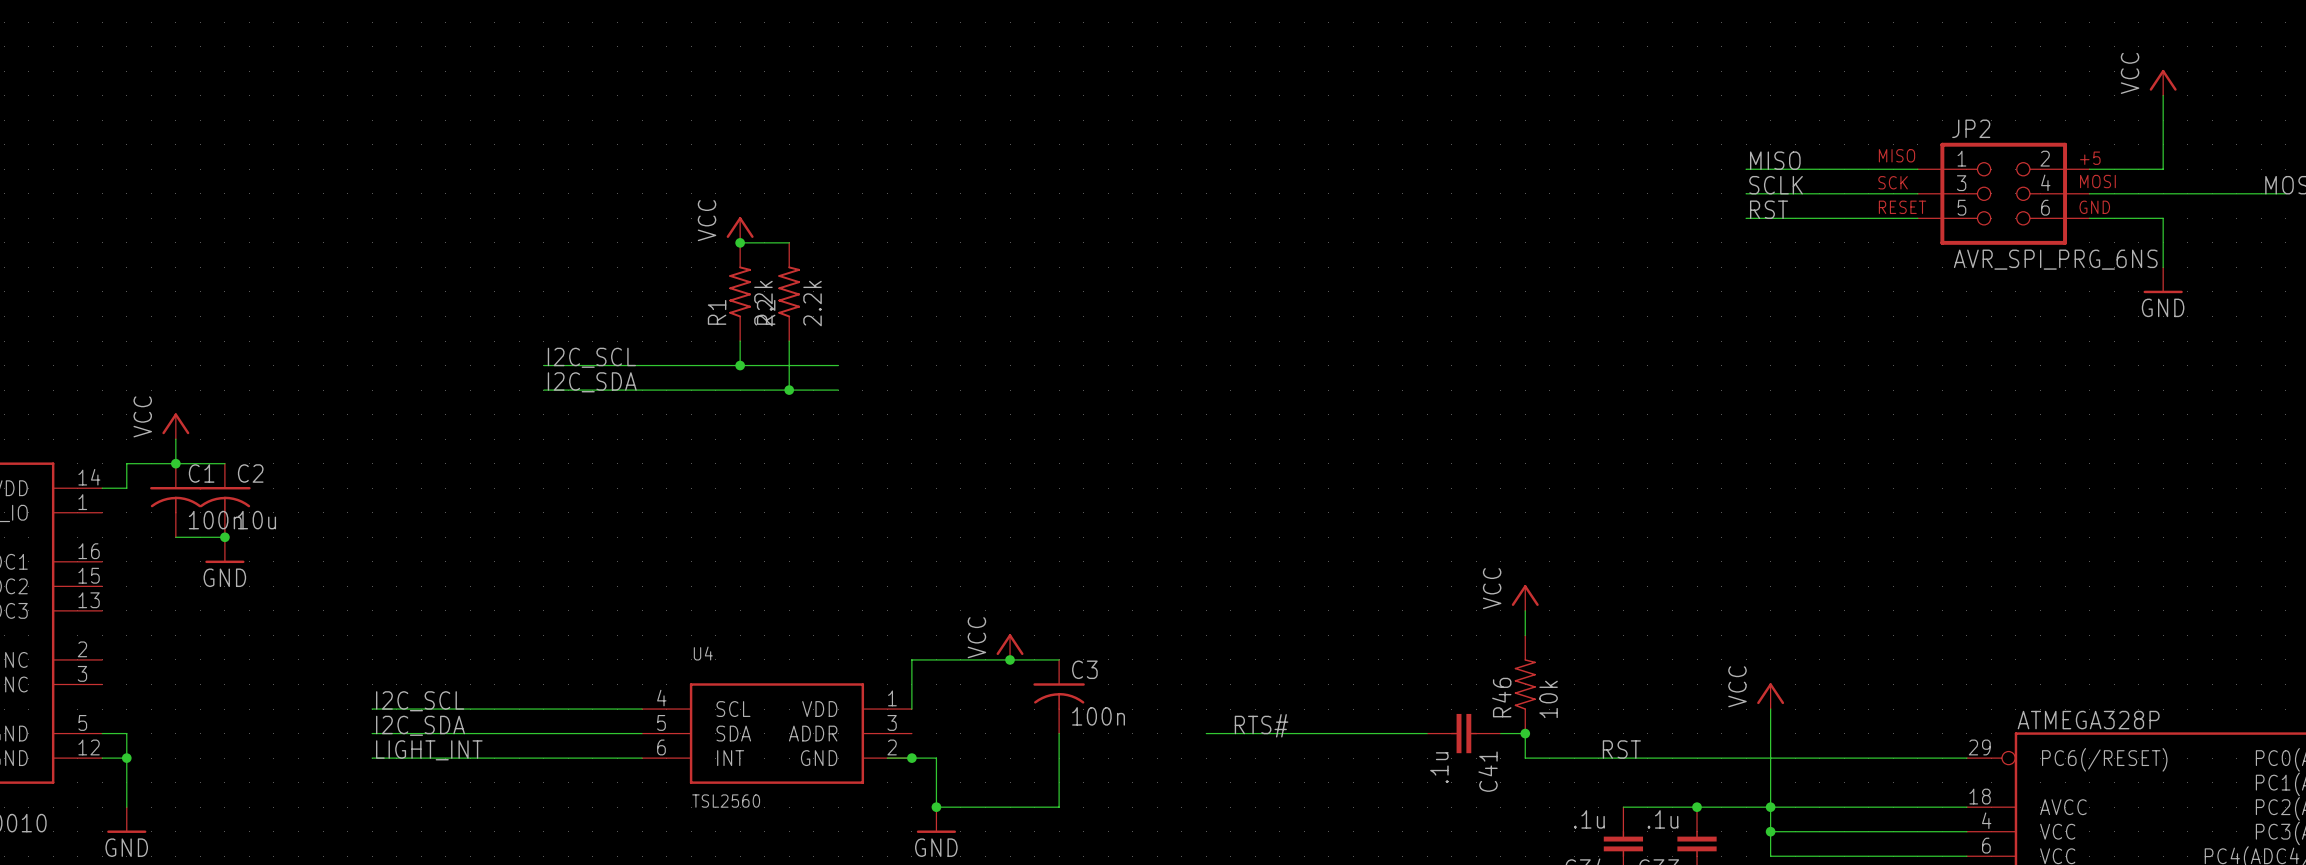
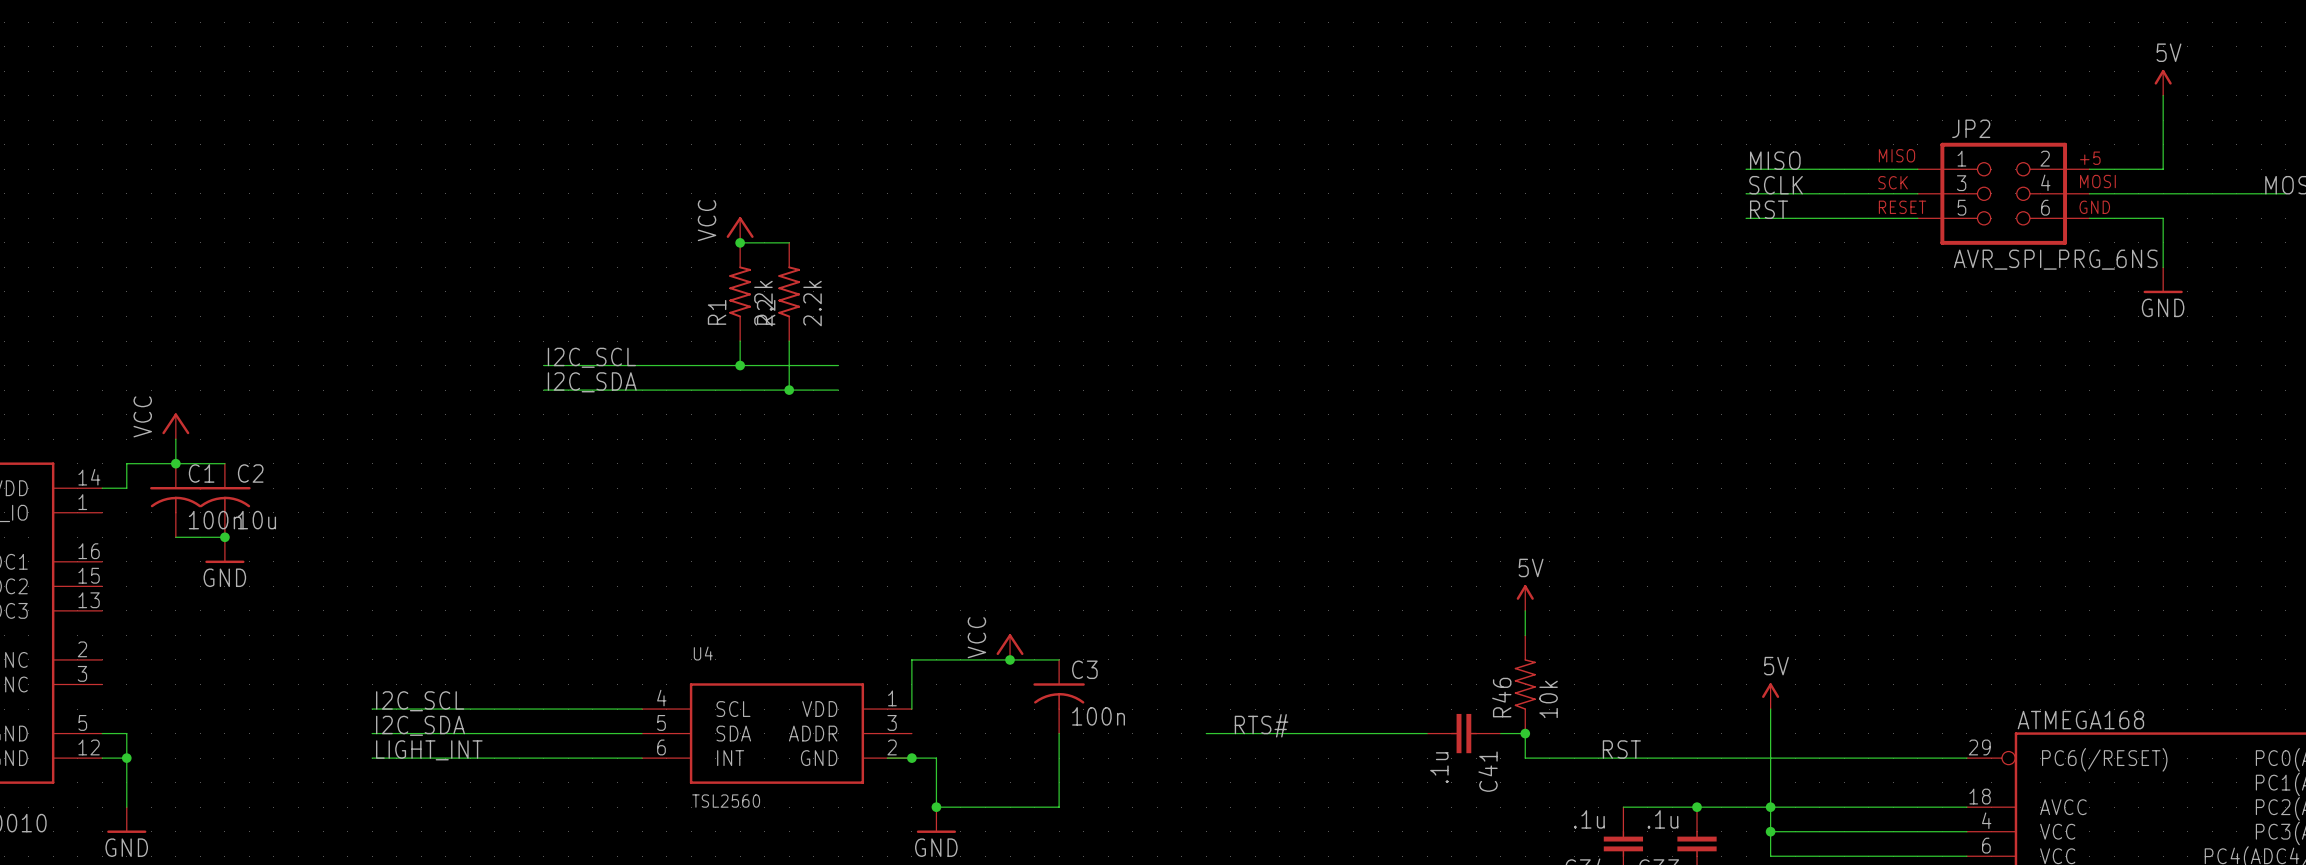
power symbol: VCC (2163, 82) -> 5V (2163, 82)
power symbol: VCC (1525, 598) -> 5V (1525, 598)
power symbol: VCC (1770, 696) -> 5V (1770, 696)
part value: ATMEGA328P (2088, 720) -> ATMEGA168 (2080, 720)

